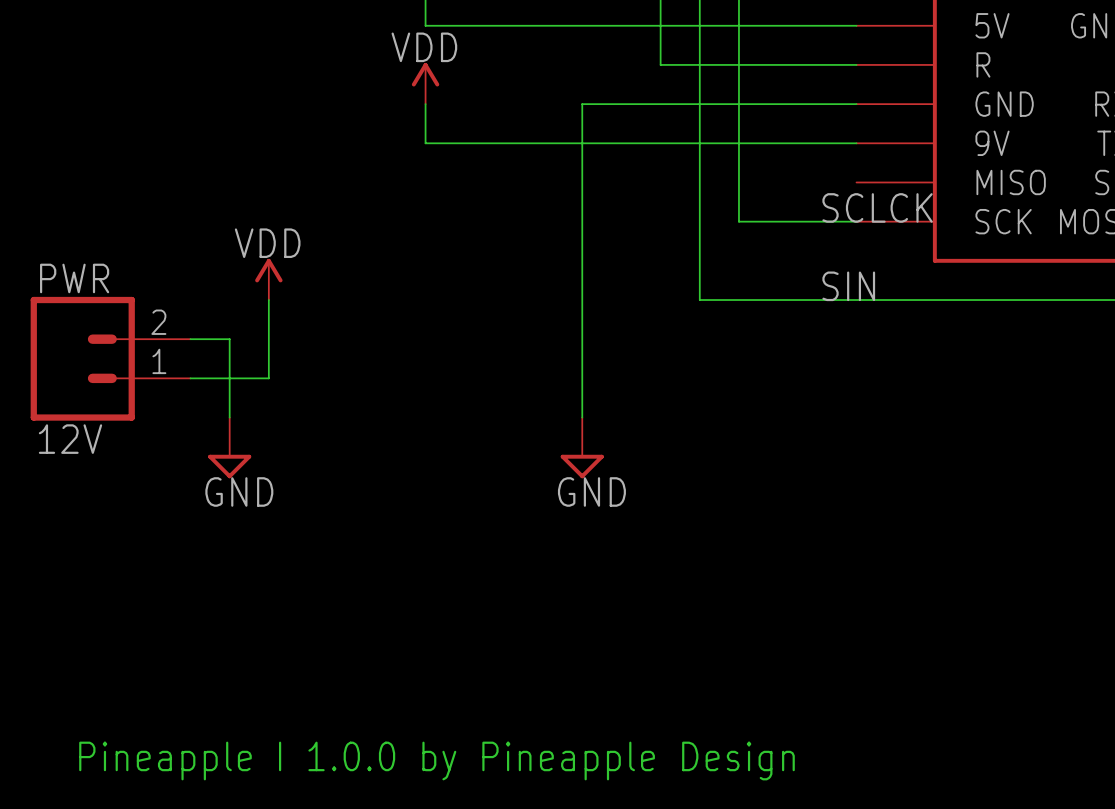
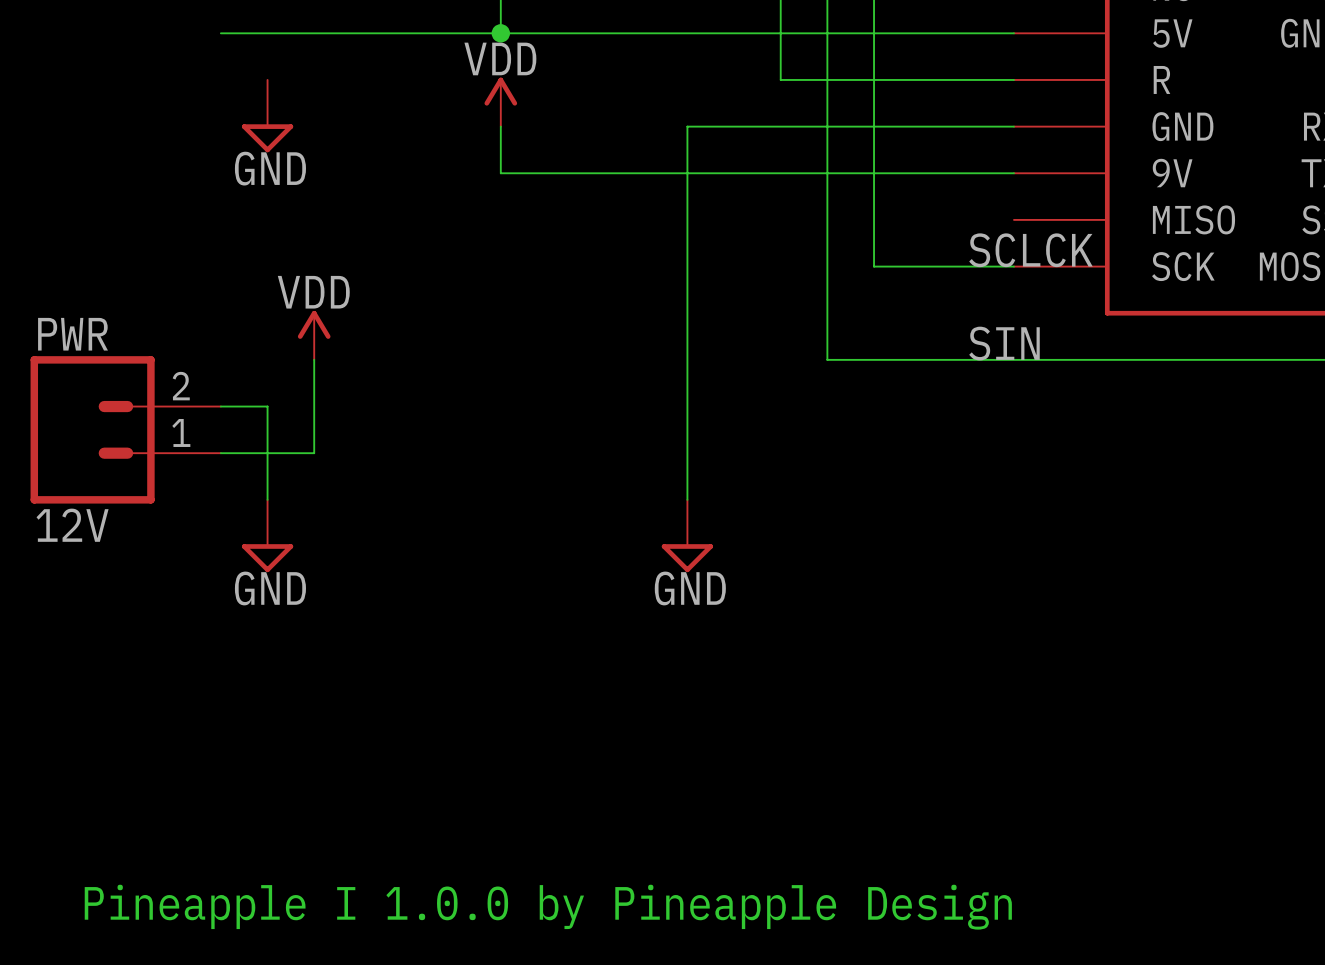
wire: none -> (220, 33) (500, 33)
junction: none -> (500, 33)
power symbol: none -> GND (267, 116)

